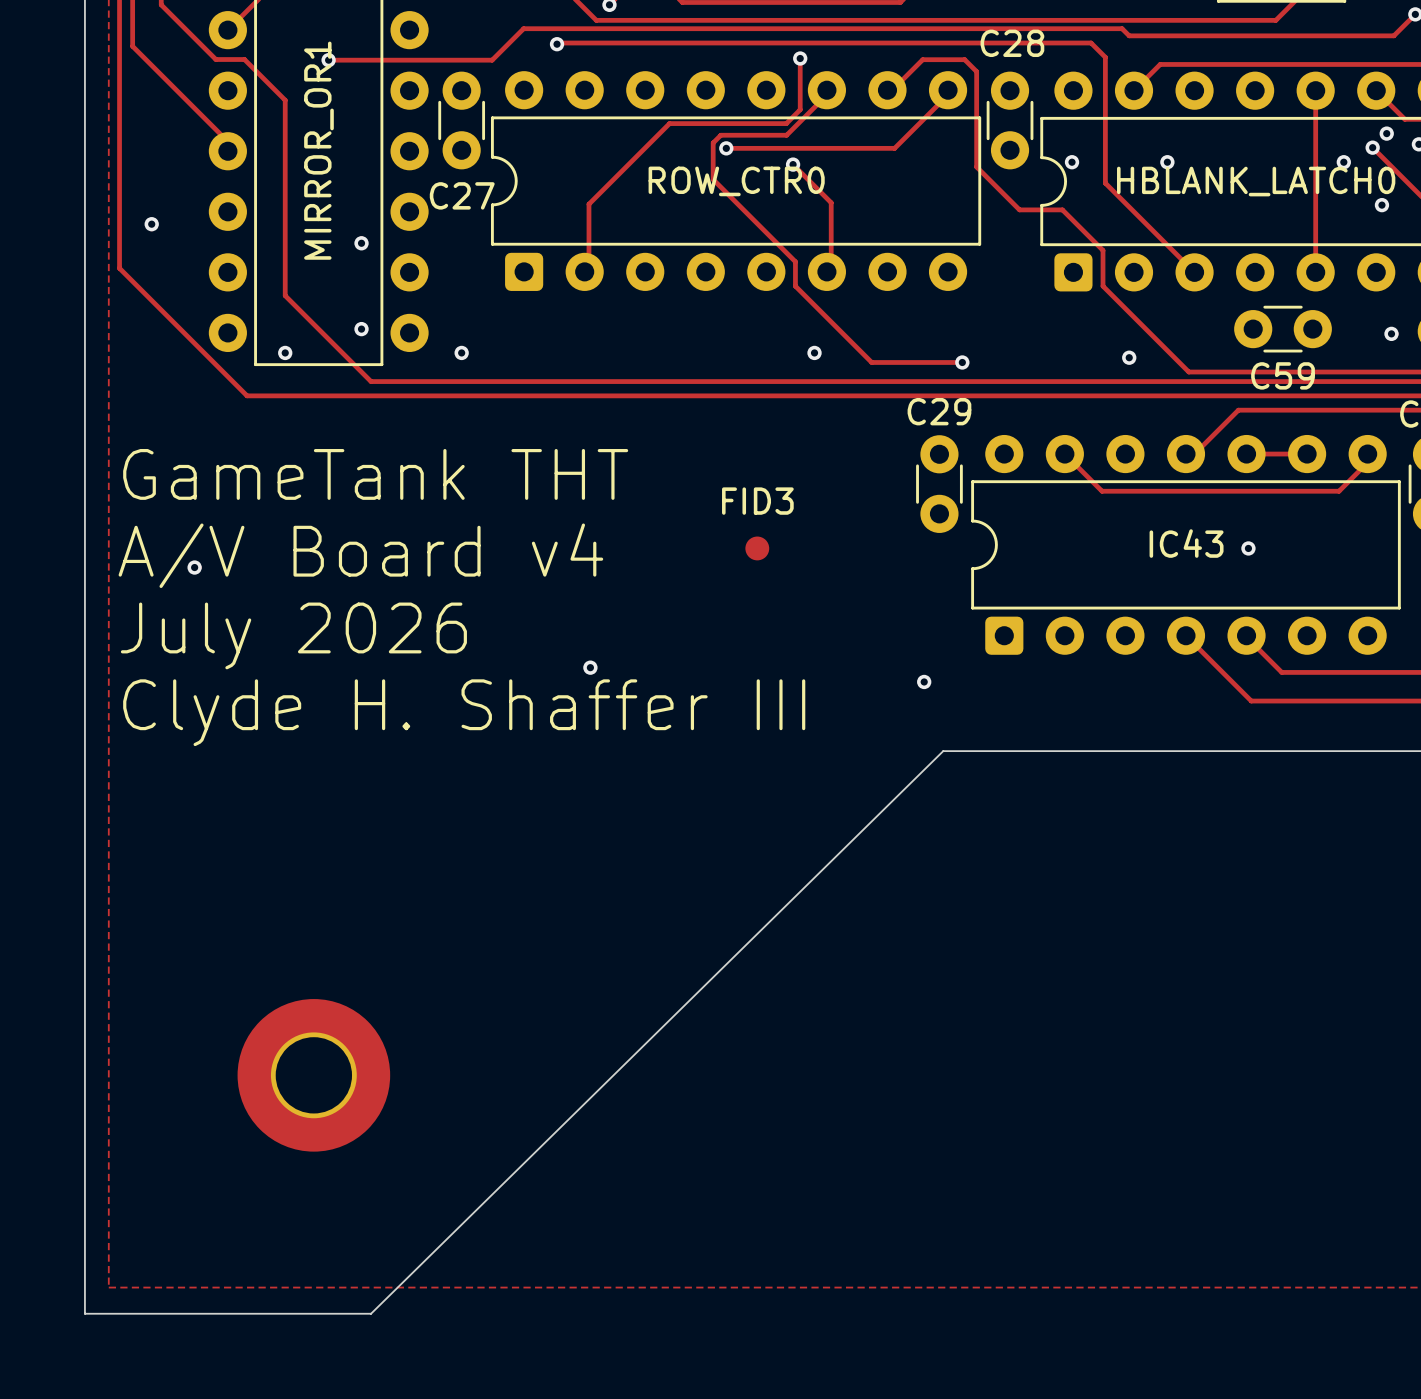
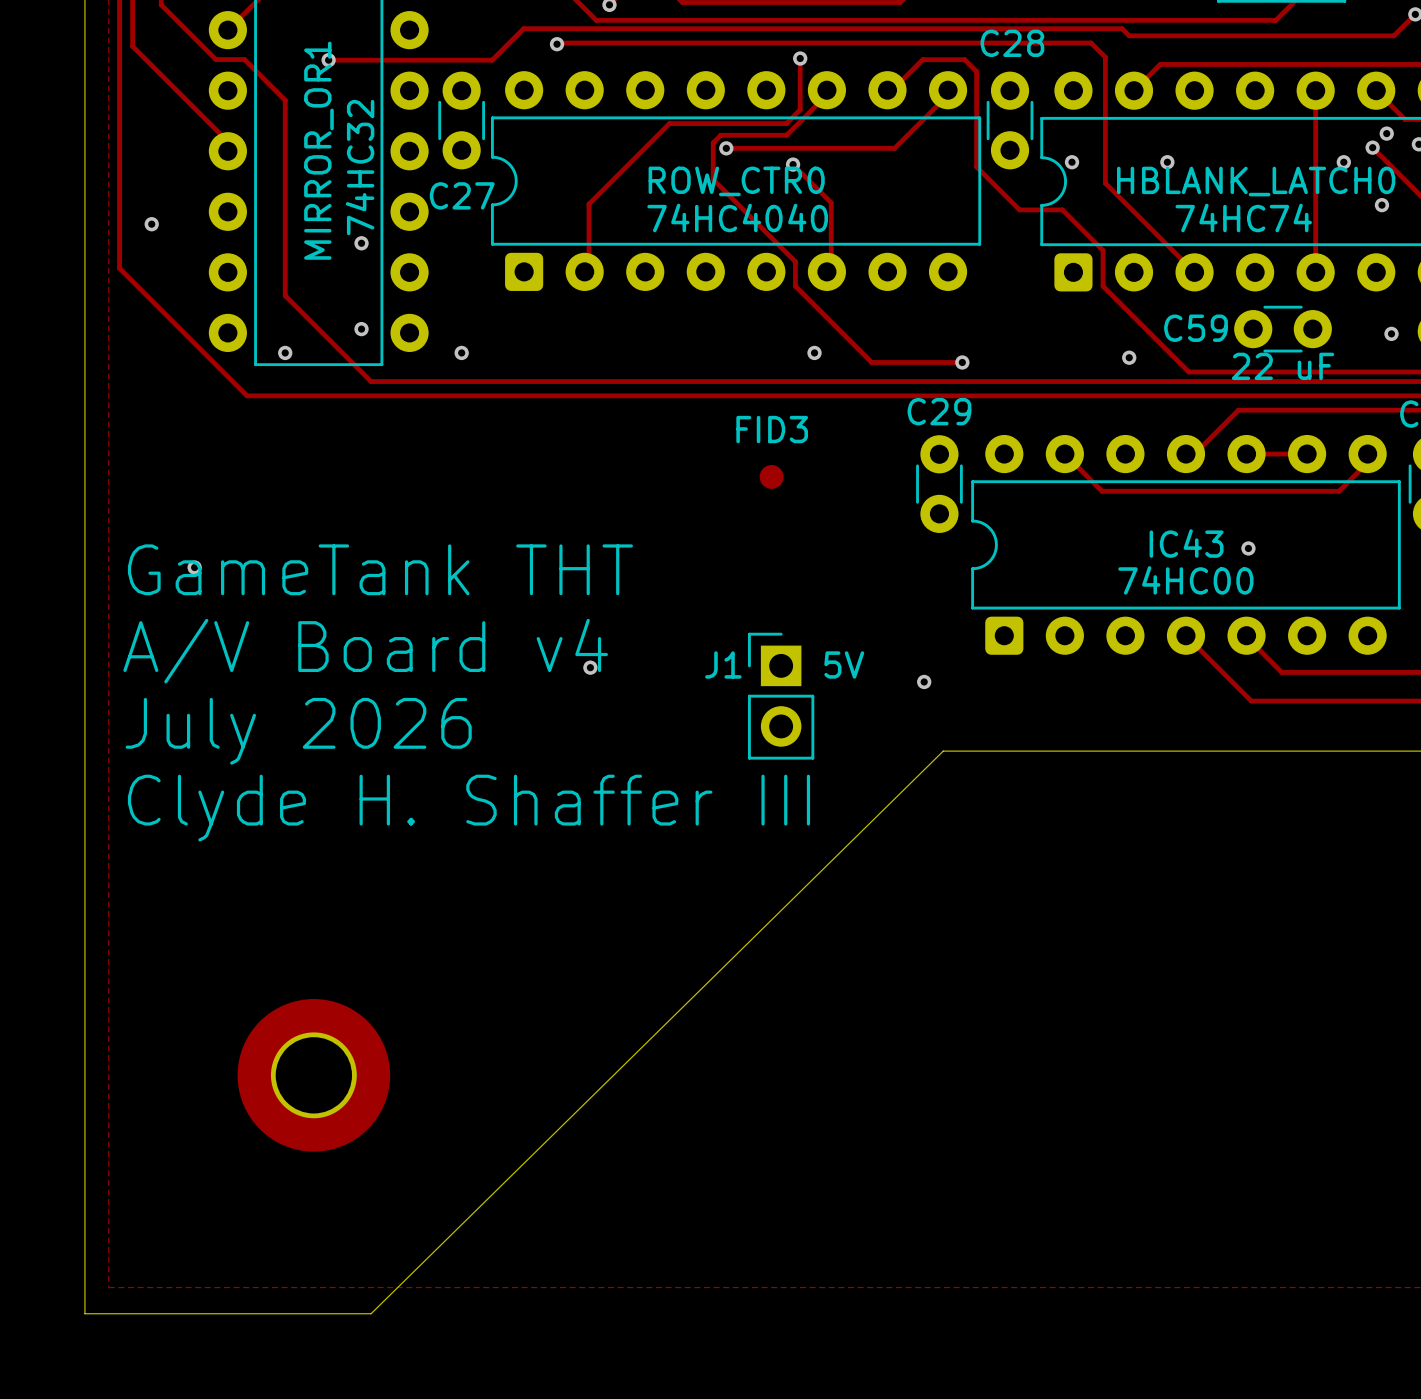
MIRROR_OR1 value: none -> 74HC32 (360, 167)
ROW_CTR0 value: none -> 74HC4040 (737, 217)
HBLANK_LATCH0 value: none -> 74HC74 (1243, 217)
C59 value: none -> 22 uF (1283, 366)
C59 name position: C59 (1283, 375) -> C59 (1195, 328)
text position: GameTank THT (375, 474) -> GameTank THT (380, 569)
FID3 position: (757, 548) -> (771, 476)
text position: A/V Board v4 (360, 555) -> A/V Board v4 (365, 651)
IC43 value: none -> 74HC00 (1185, 580)
text position: July 2026 (293, 635) -> July 2026 (298, 731)
J1: none -> 5V (781, 696)
text position: Clyde H. Shaffer III (464, 712) -> Clyde H. Shaffer III (468, 808)

